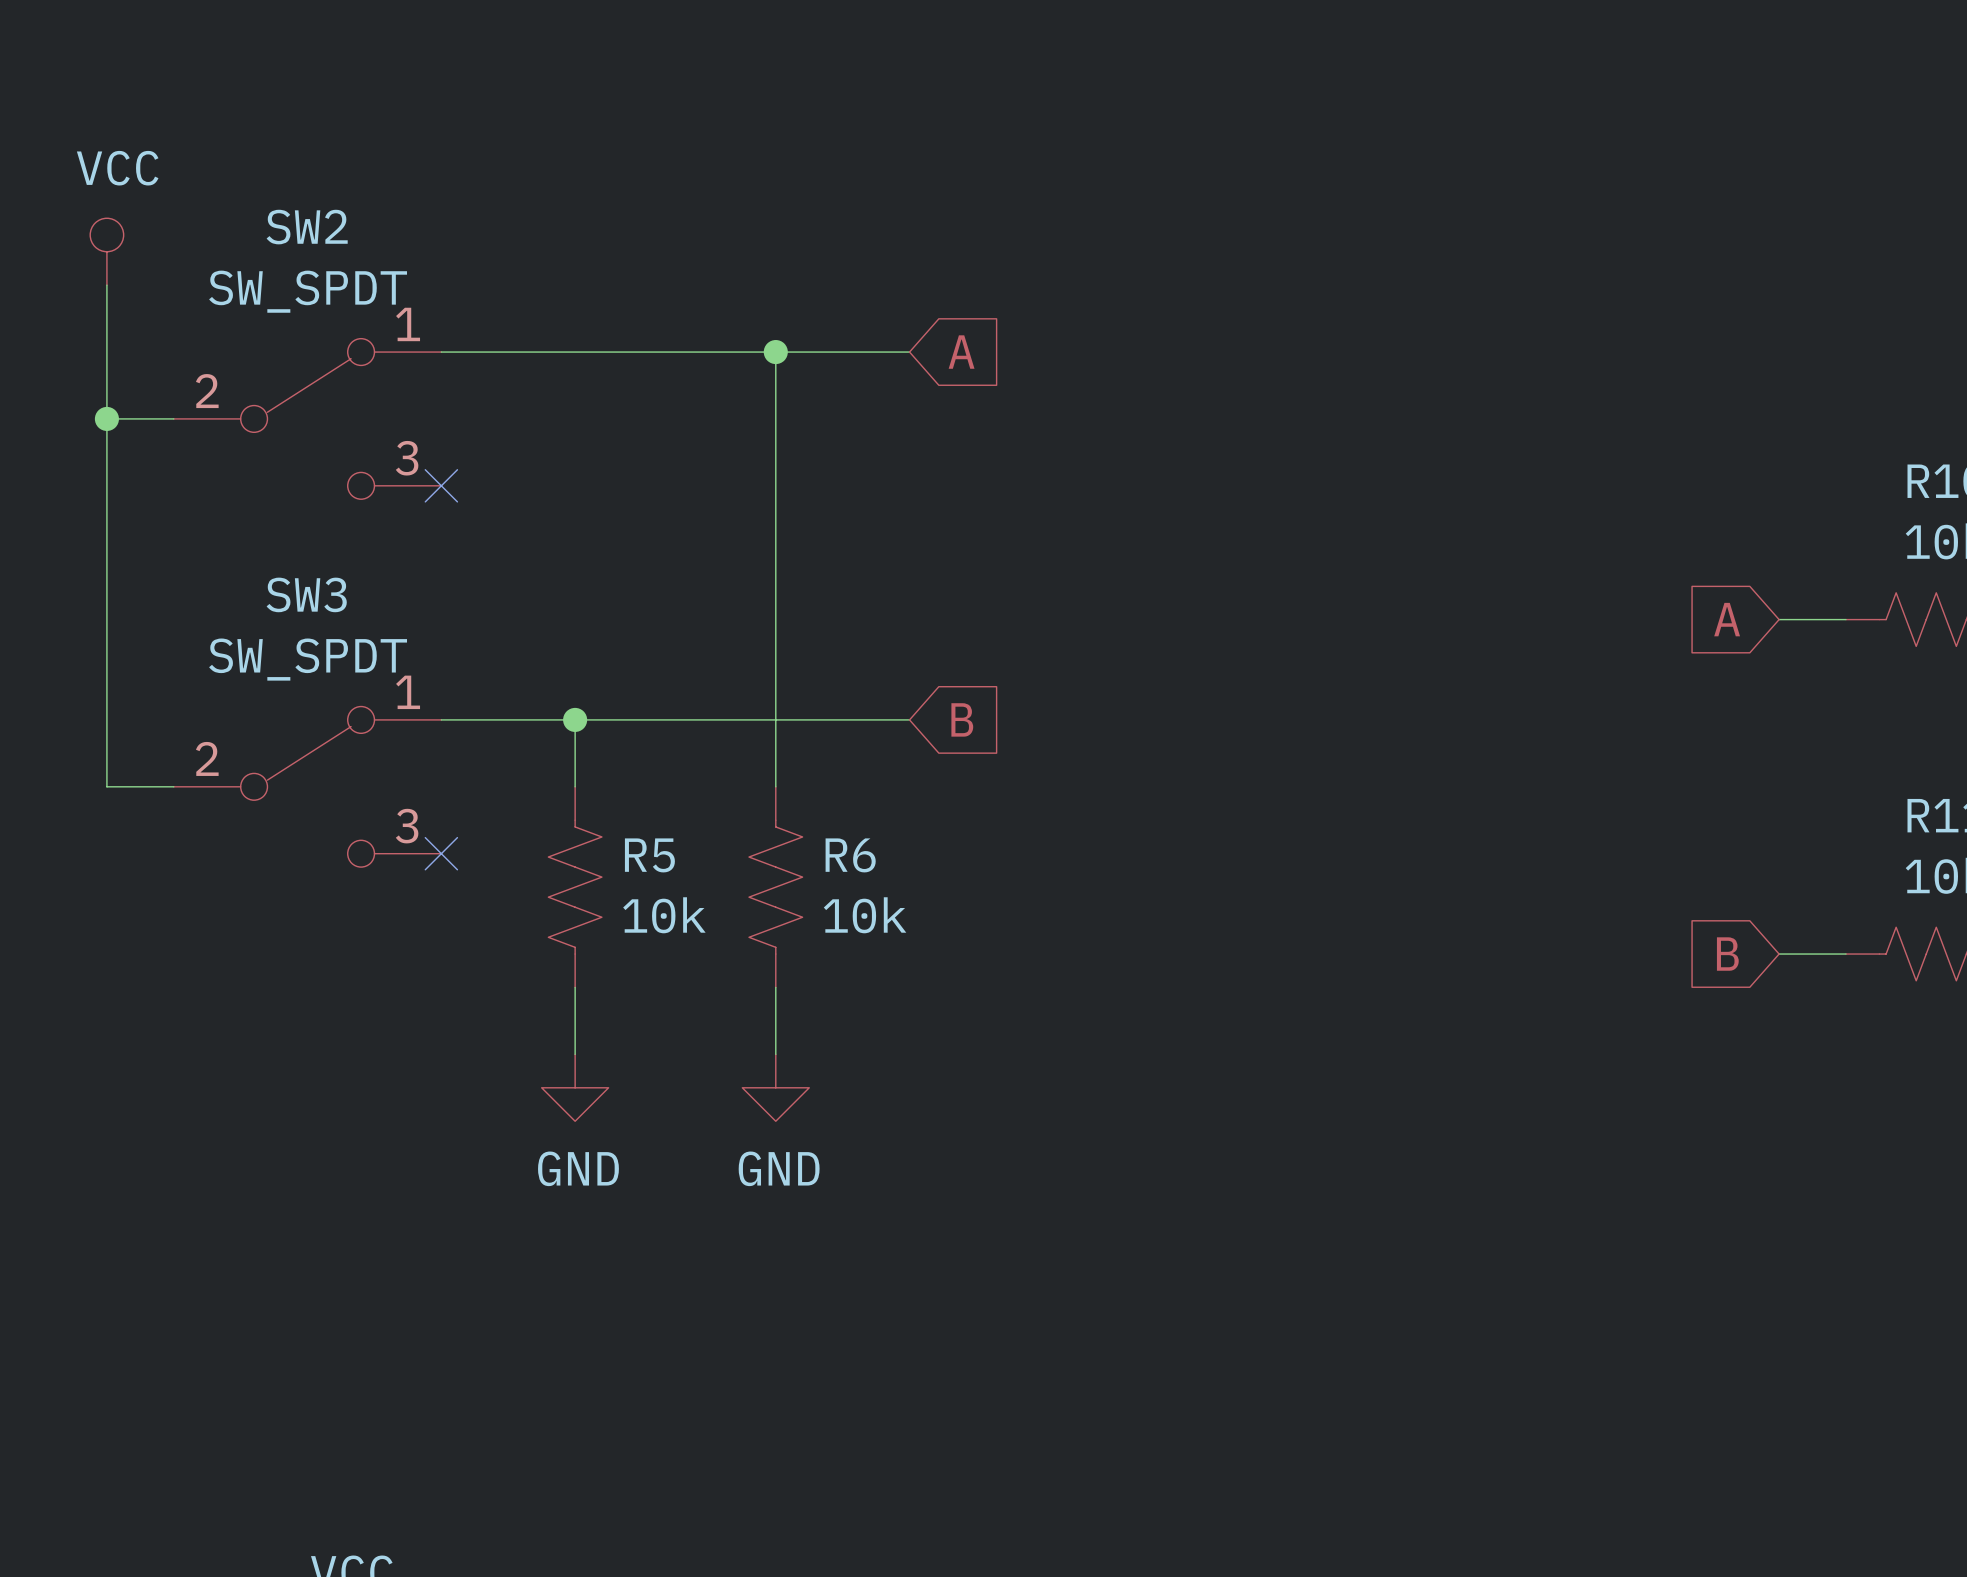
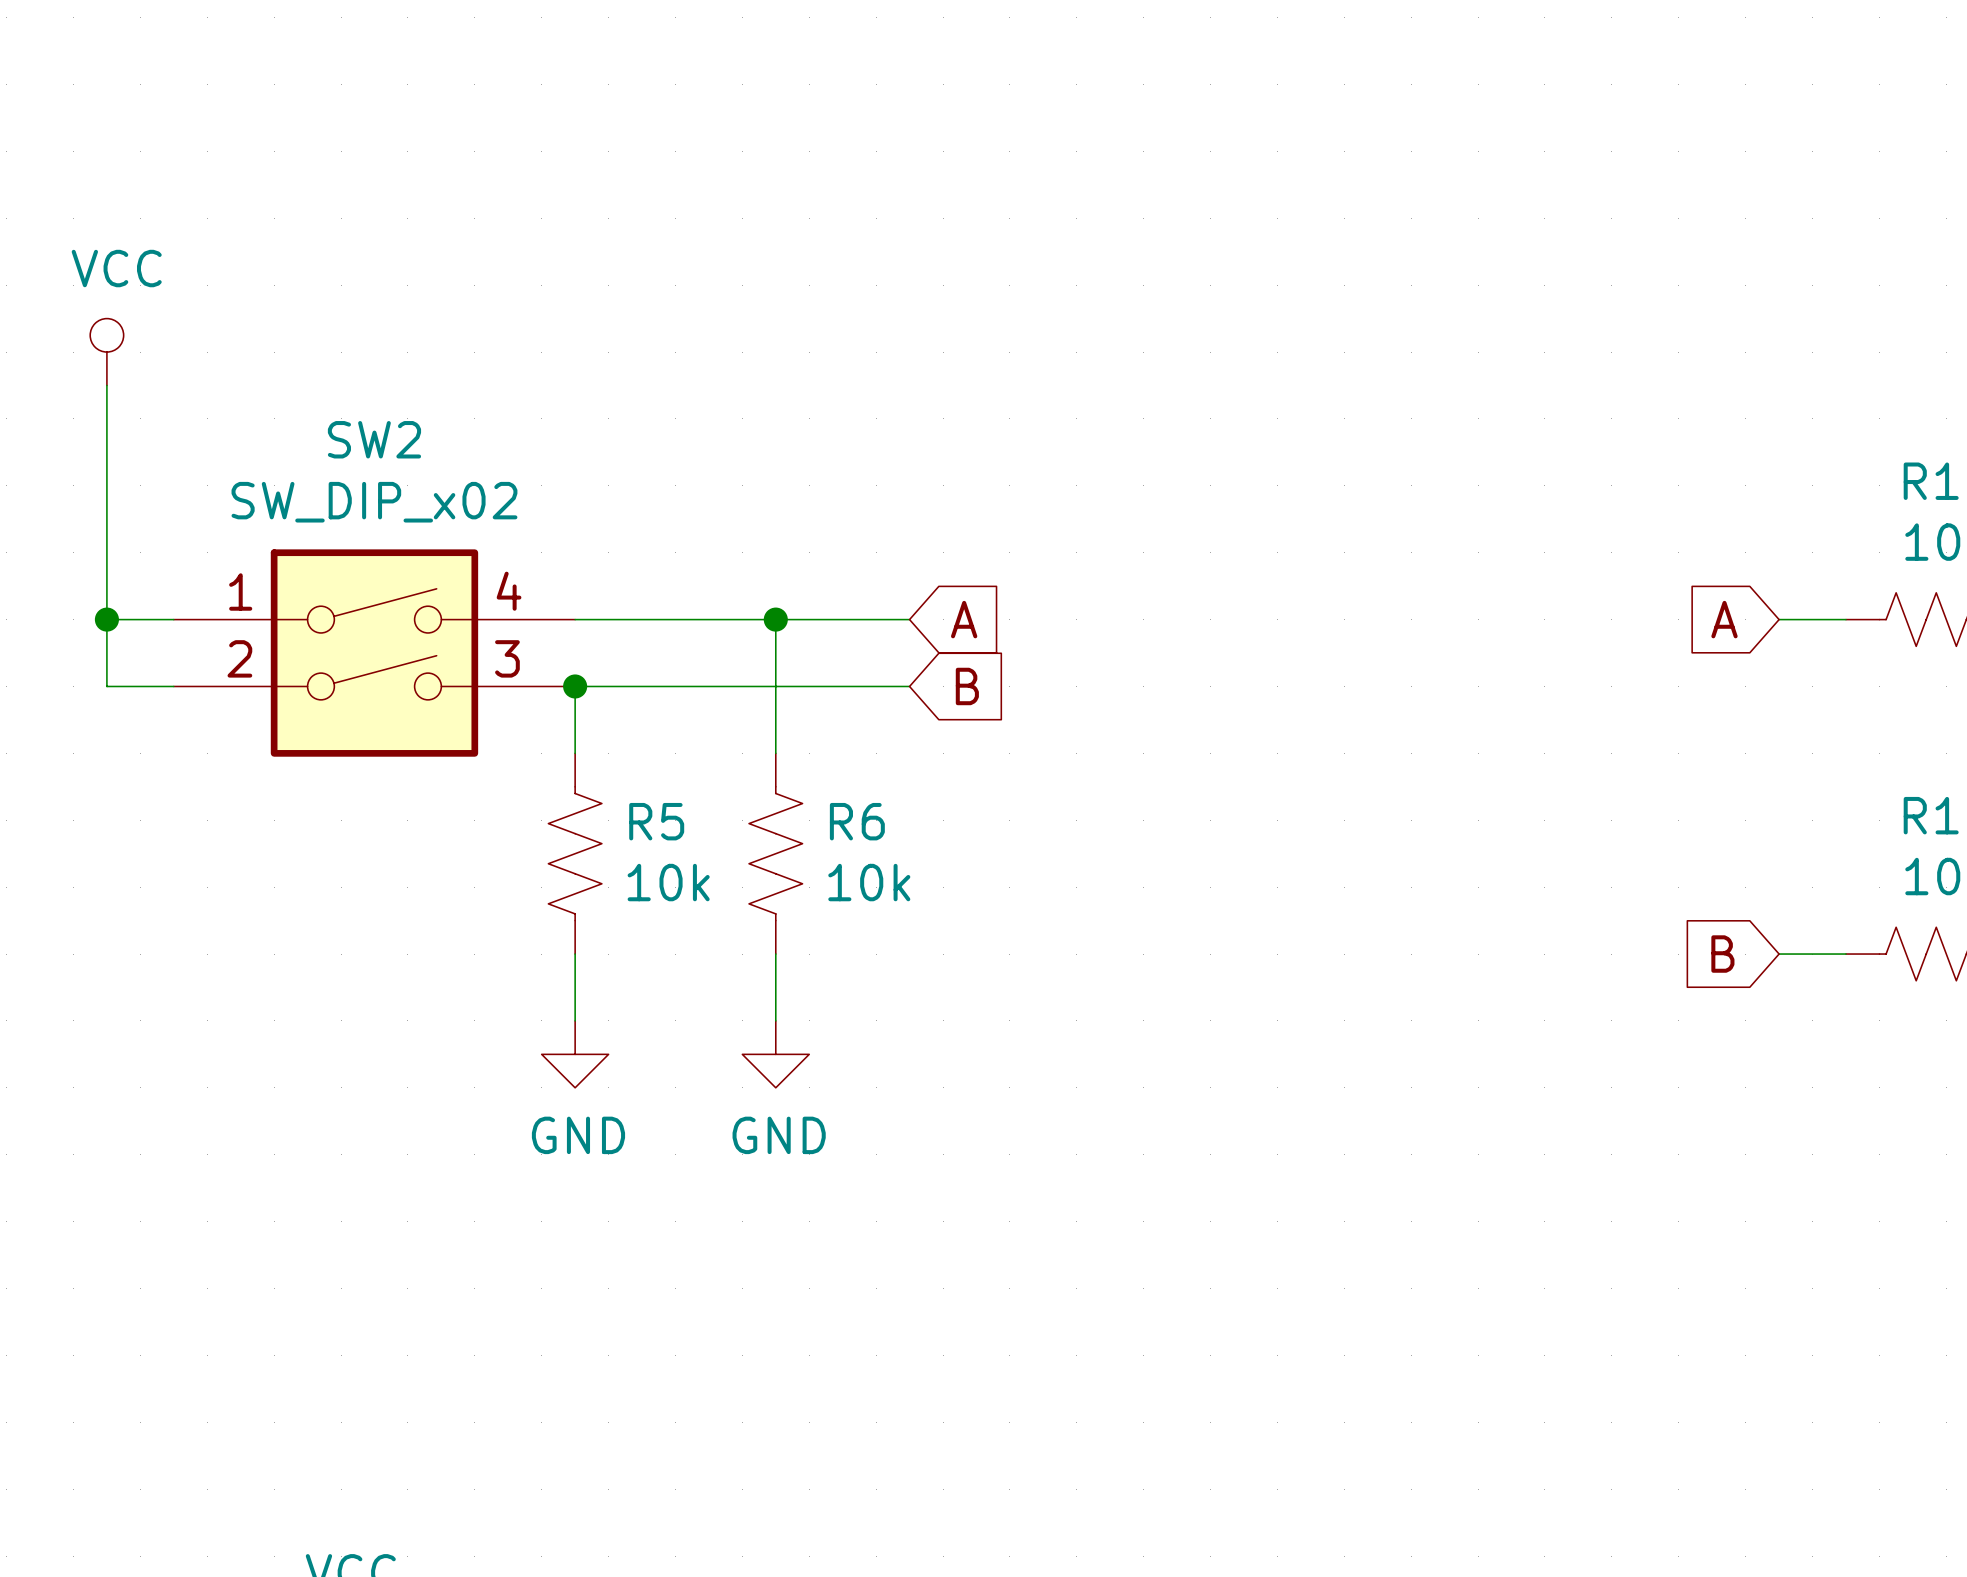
power symbol position: VCC (106, 251) -> VCC (106, 352)
wire: (106, 285) (106, 385) -> none
SW2 value: SW_SPDT (308, 291) -> SW_DIP_x02 (374, 502)
SW2 symbol: [173, 338, 442, 500] -> [173, 549, 576, 757]
wire: (441, 352) (909, 352) -> none
wire: (775, 352) (775, 619) -> none
junction: (775, 352) -> none
global label position: A (961, 352) -> A (964, 619)
wire: (106, 418) (173, 418) -> (106, 619) (173, 619)
junction: (106, 418) -> none
no-connect mark: (441, 485) -> none
junction: none -> (106, 619)
wire: none -> (575, 619) (909, 619)
junction: none -> (775, 619)
wire: (106, 686) (106, 786) (173, 786) -> (106, 686) (173, 686)
wire: none -> (909, 686) (575, 686) (575, 719)
wire: (441, 719) (909, 719) -> none
junction position: (575, 719) -> (575, 686)
global label position: B (962, 719) -> B (967, 686)
SW3: SW_SPDT (307, 786) -> none
no-connect mark: (441, 853) -> none
R5 position: (575, 887) -> (575, 853)
R6 position: (775, 887) -> (775, 853)
power symbol position: GND (575, 1087) -> GND (575, 1054)
power symbol position: GND (775, 1087) -> GND (775, 1054)

